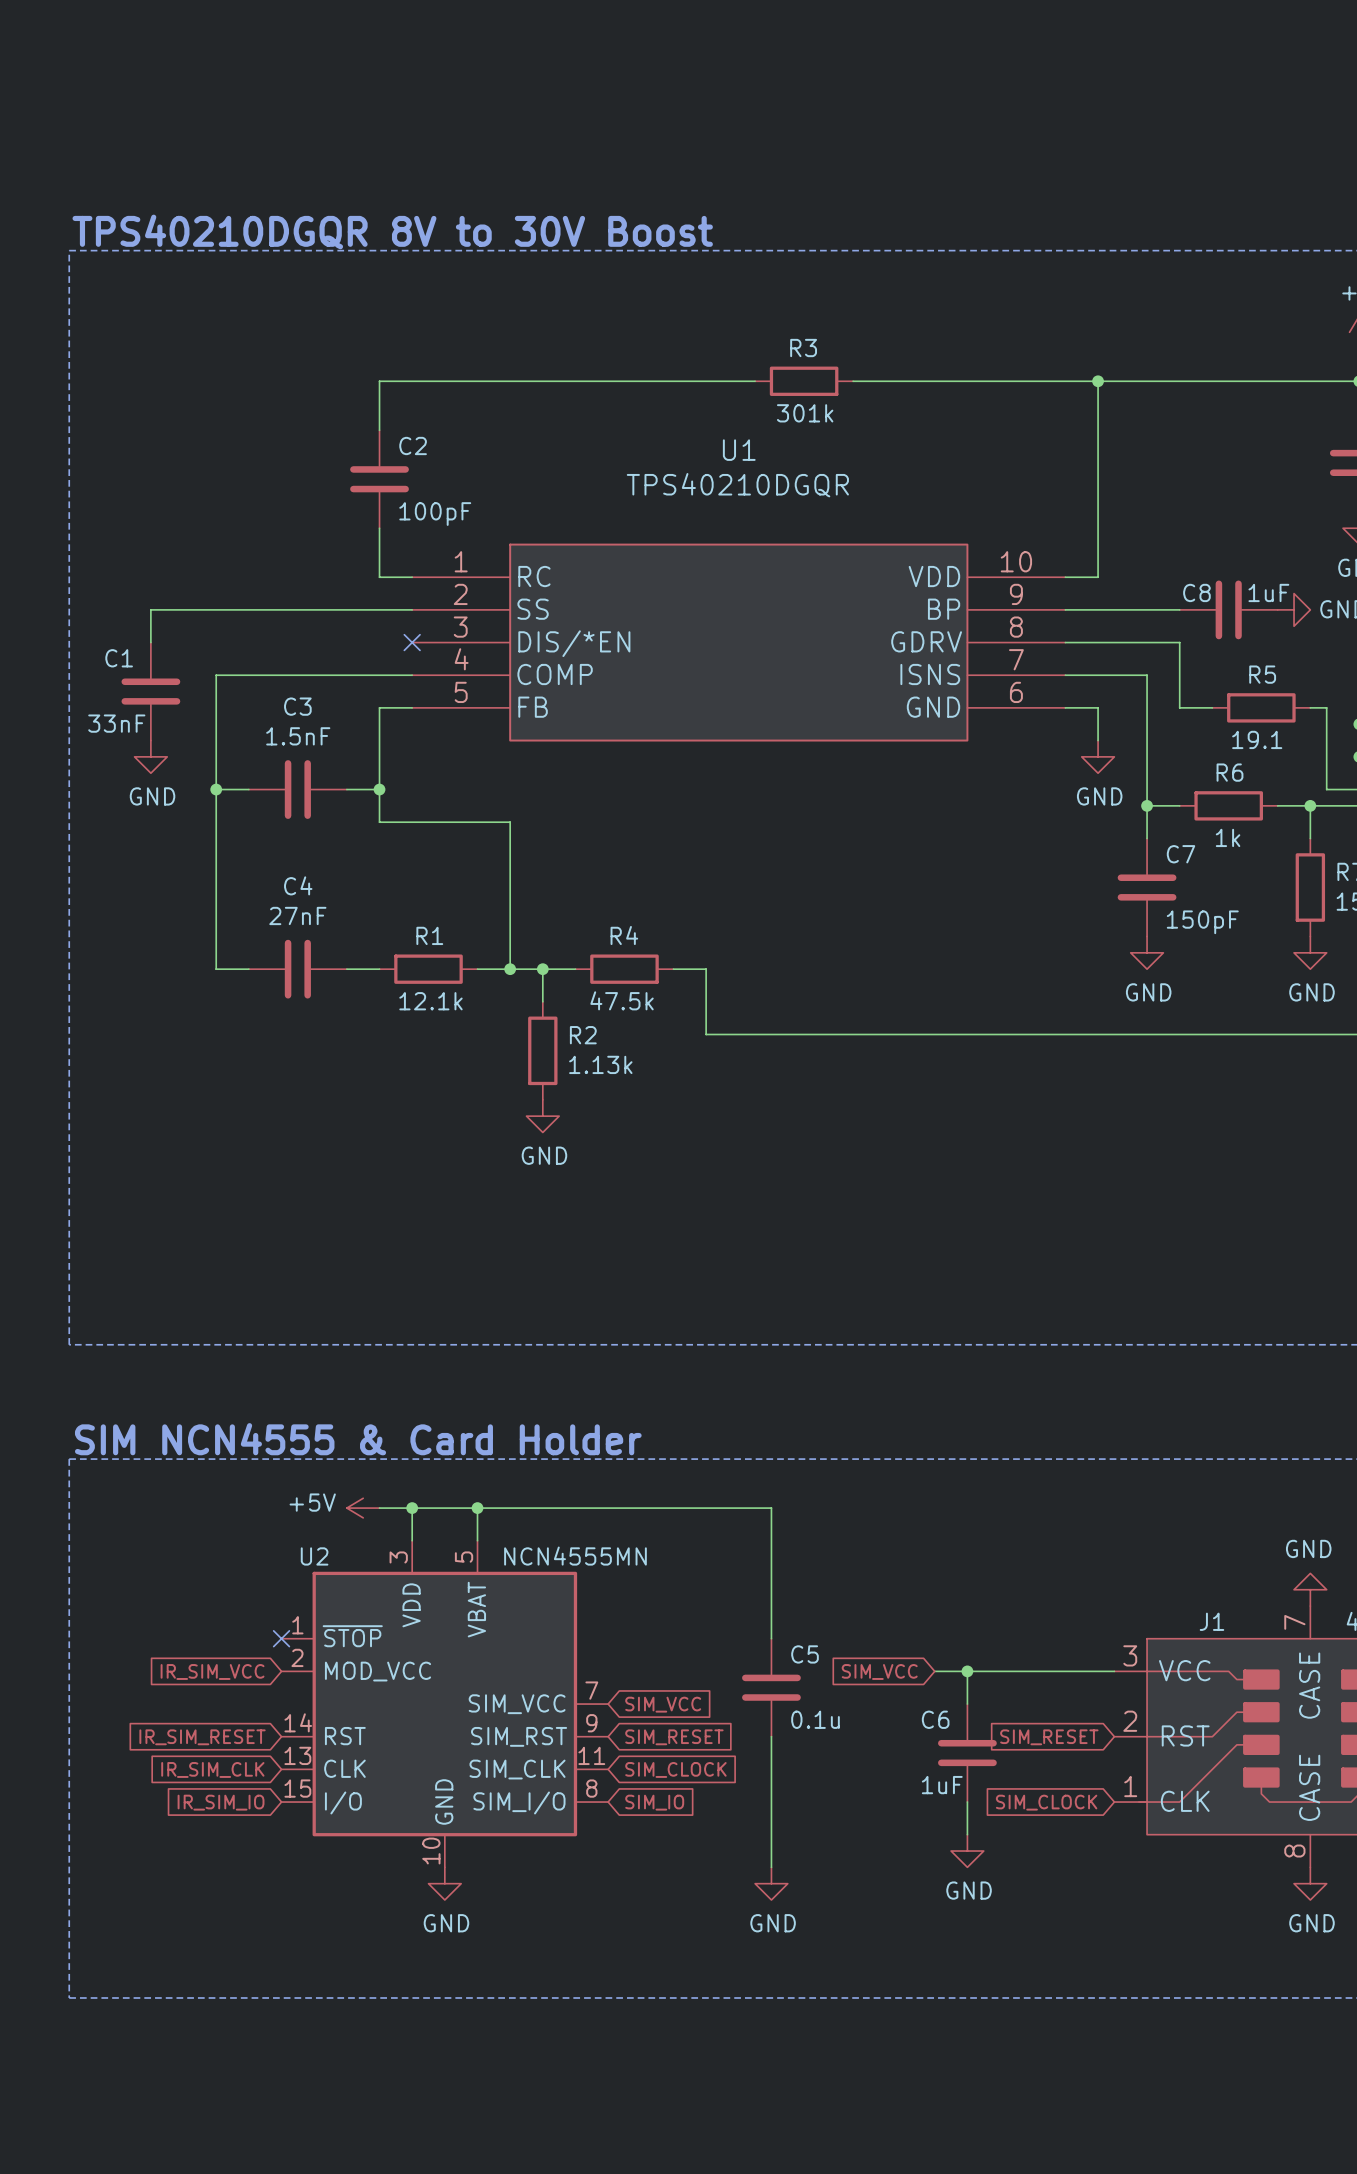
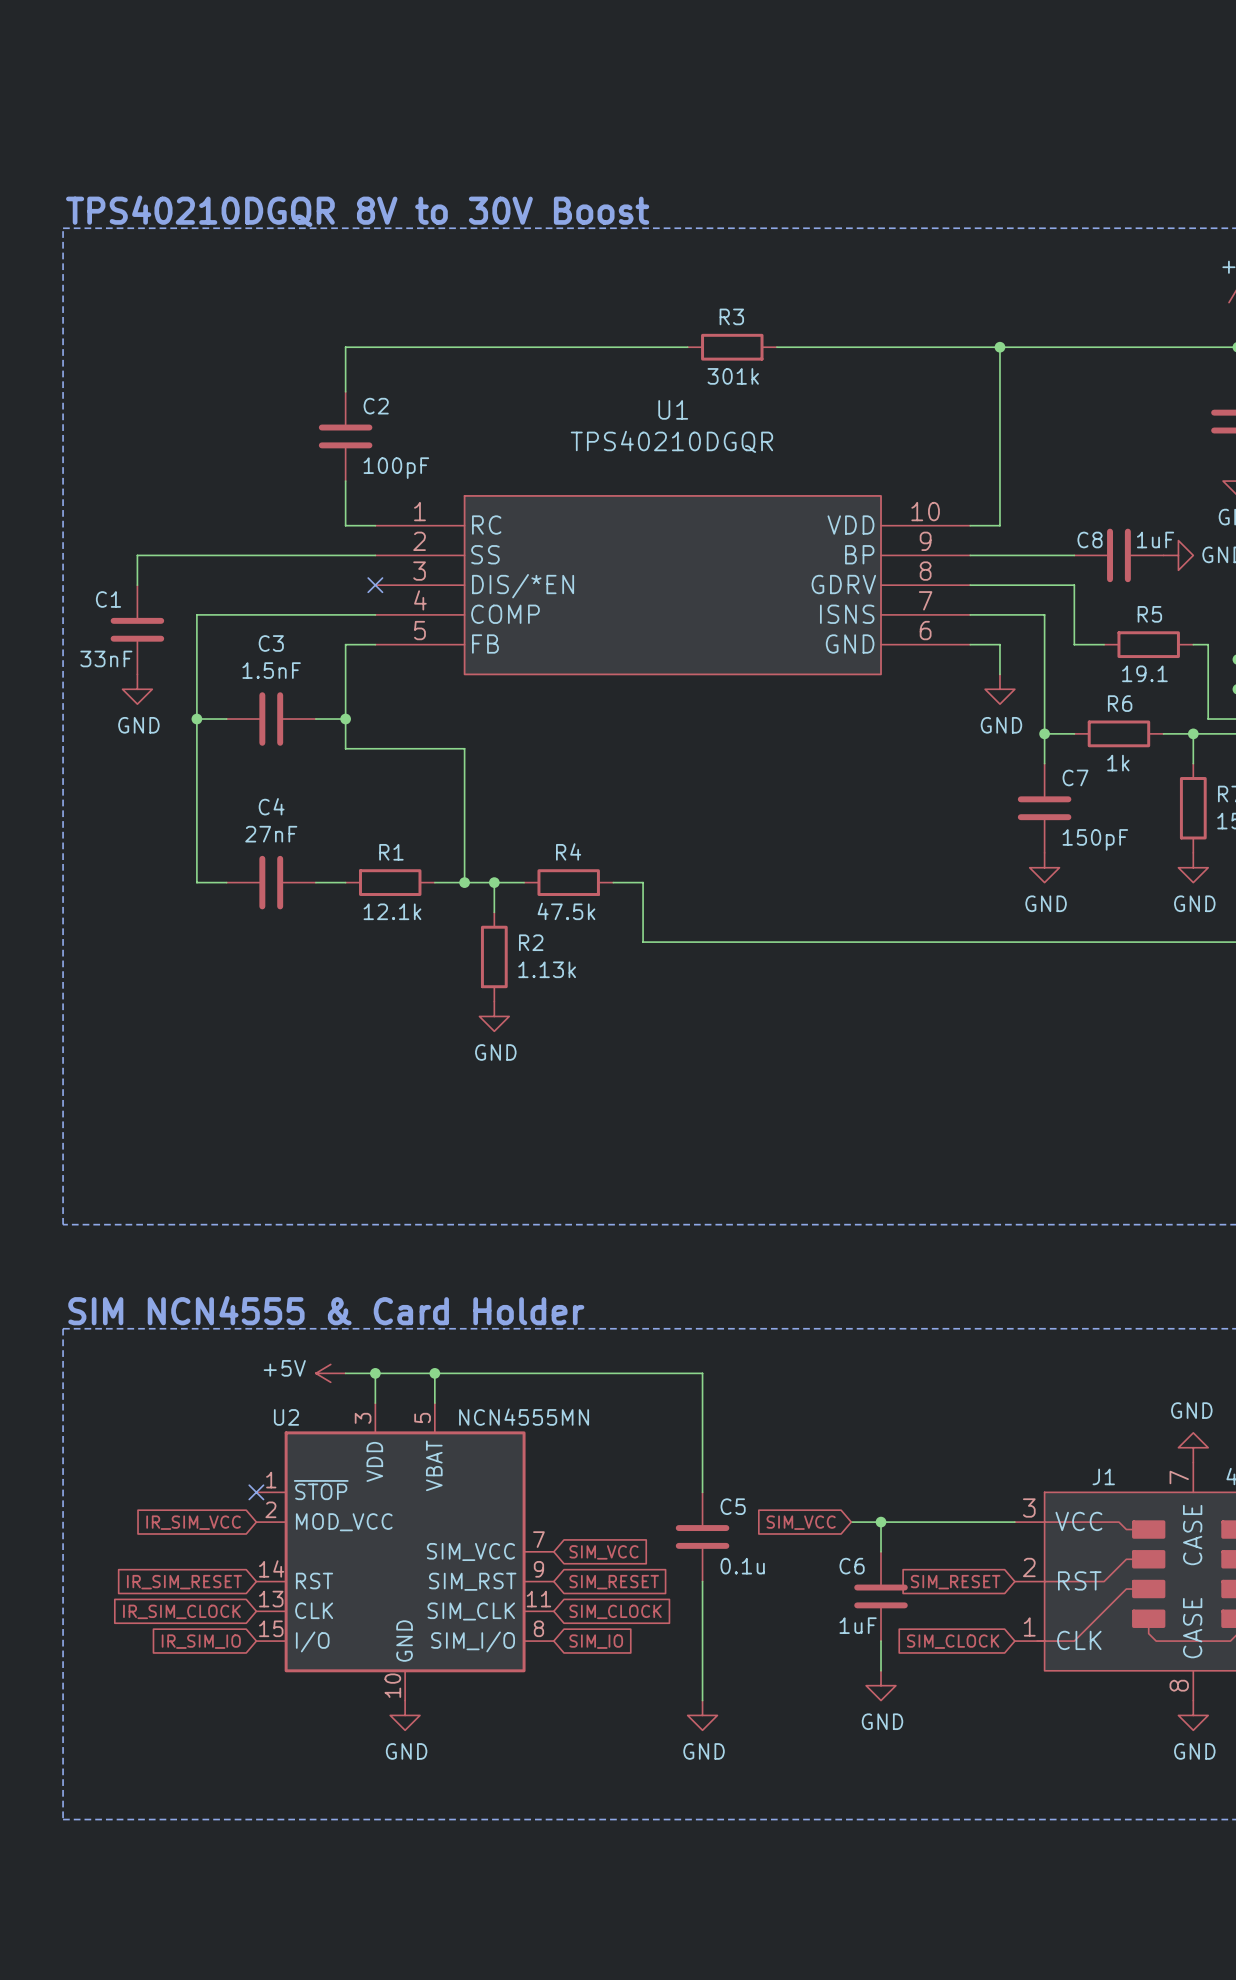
global label: IR_SIM_CLK (212, 1769) -> IR_SIM_CLOCK (181, 1611)

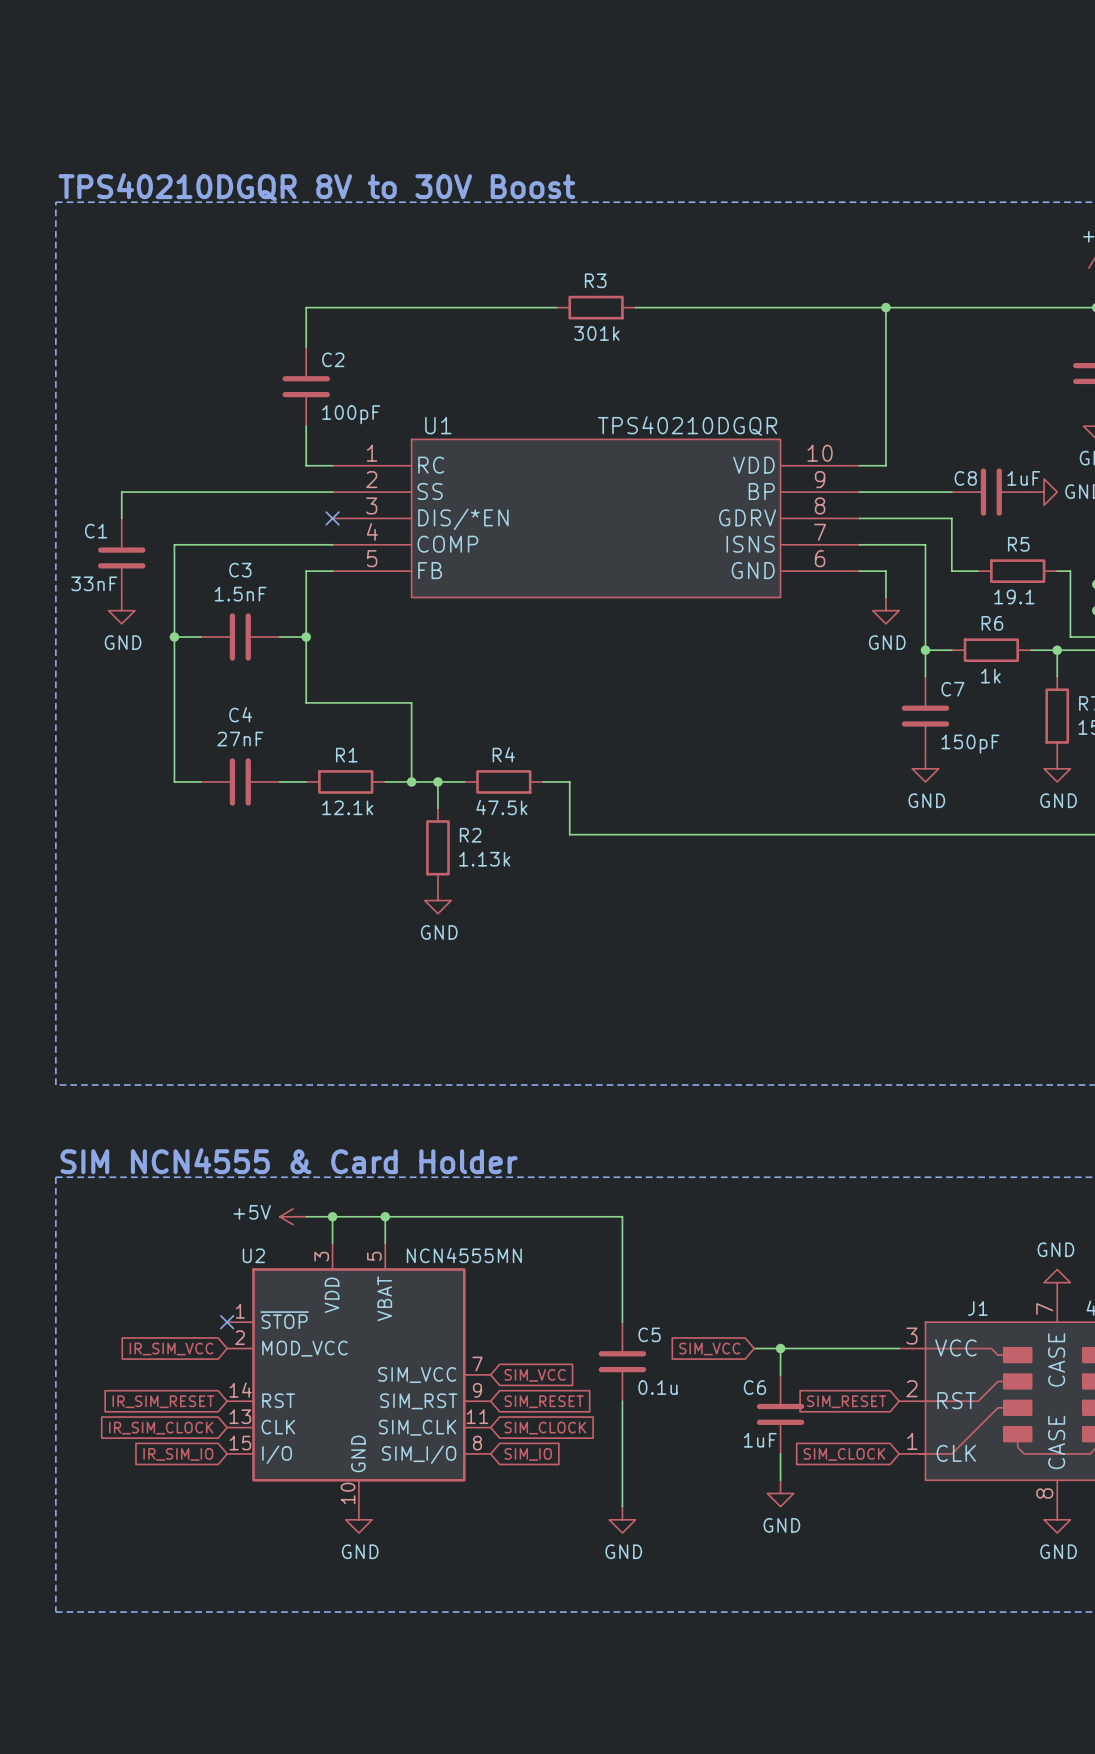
wire: (628, 347) (687, 347) -> (635, 307) (688, 307)
R3 position: (732, 347) -> (596, 307)
U1 name position: U1 (673, 409) -> U1 (438, 425)
U1 value position: TPS40210DGQR (671, 441) -> TPS40210DGQR (687, 425)
wire: (345, 748) (464, 748) (464, 793) -> (306, 663) (306, 702) (411, 702)

